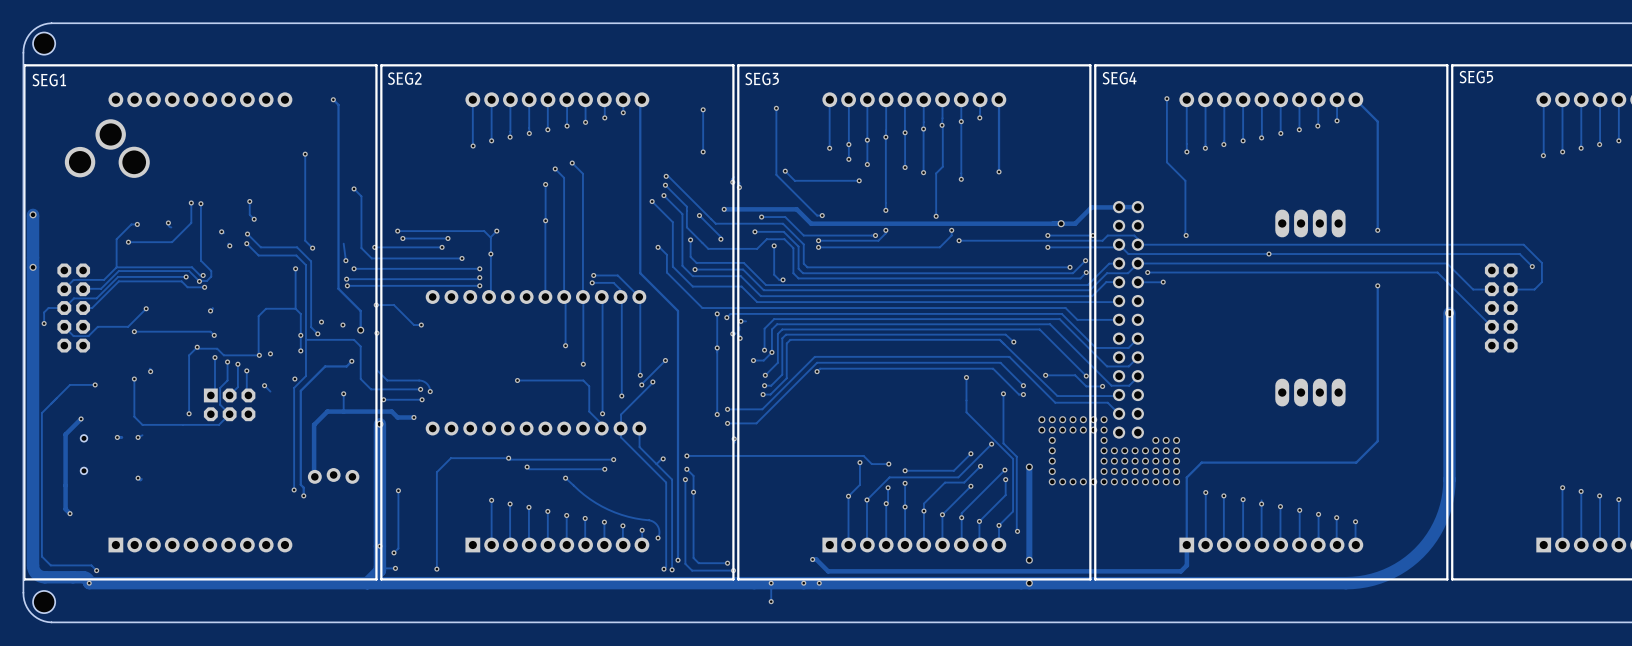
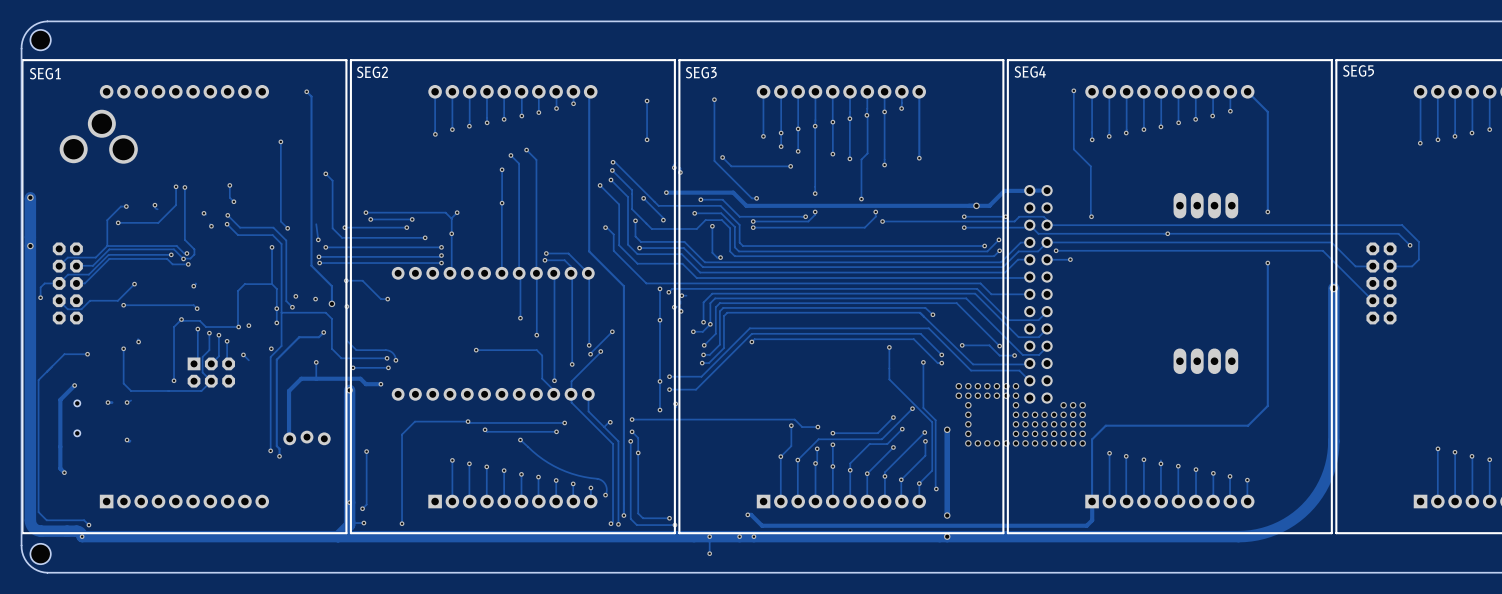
track: none -> (659, 381) (659, 410)
via: none -> (659, 410)

